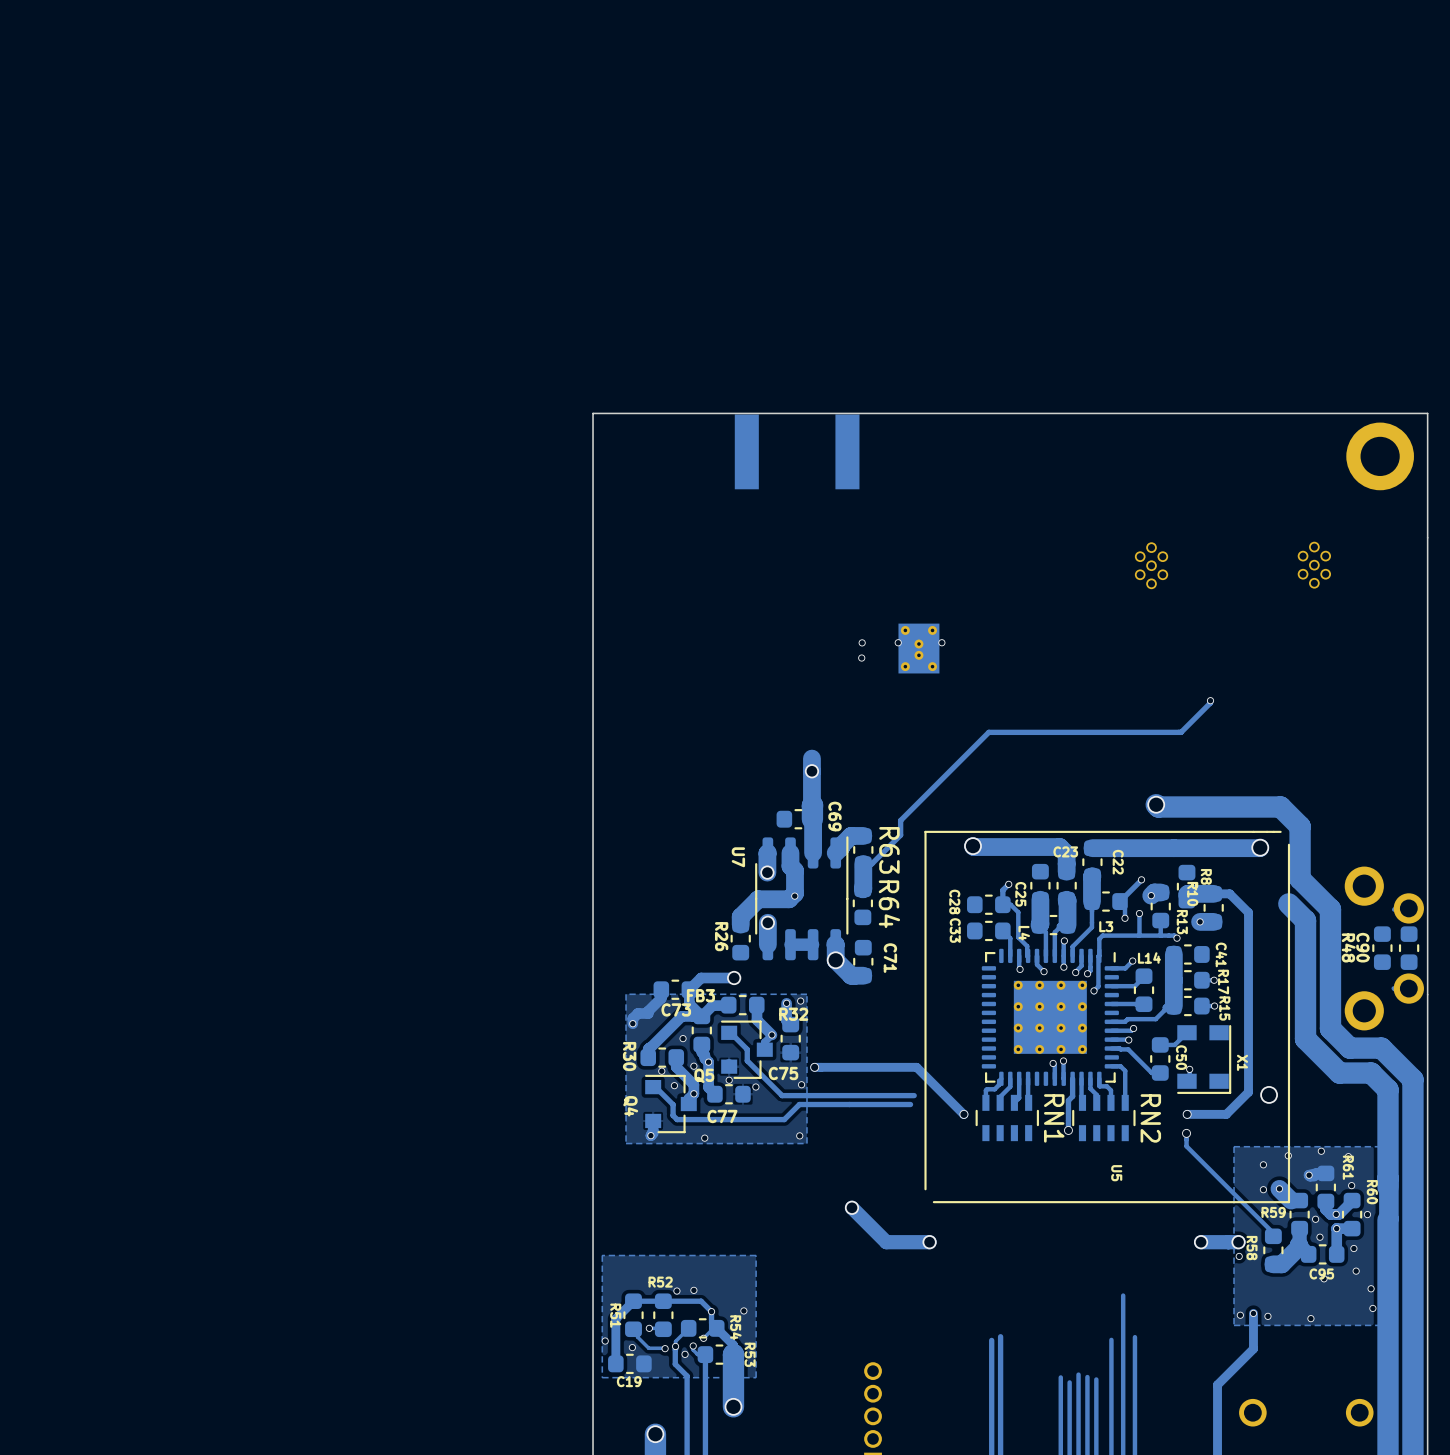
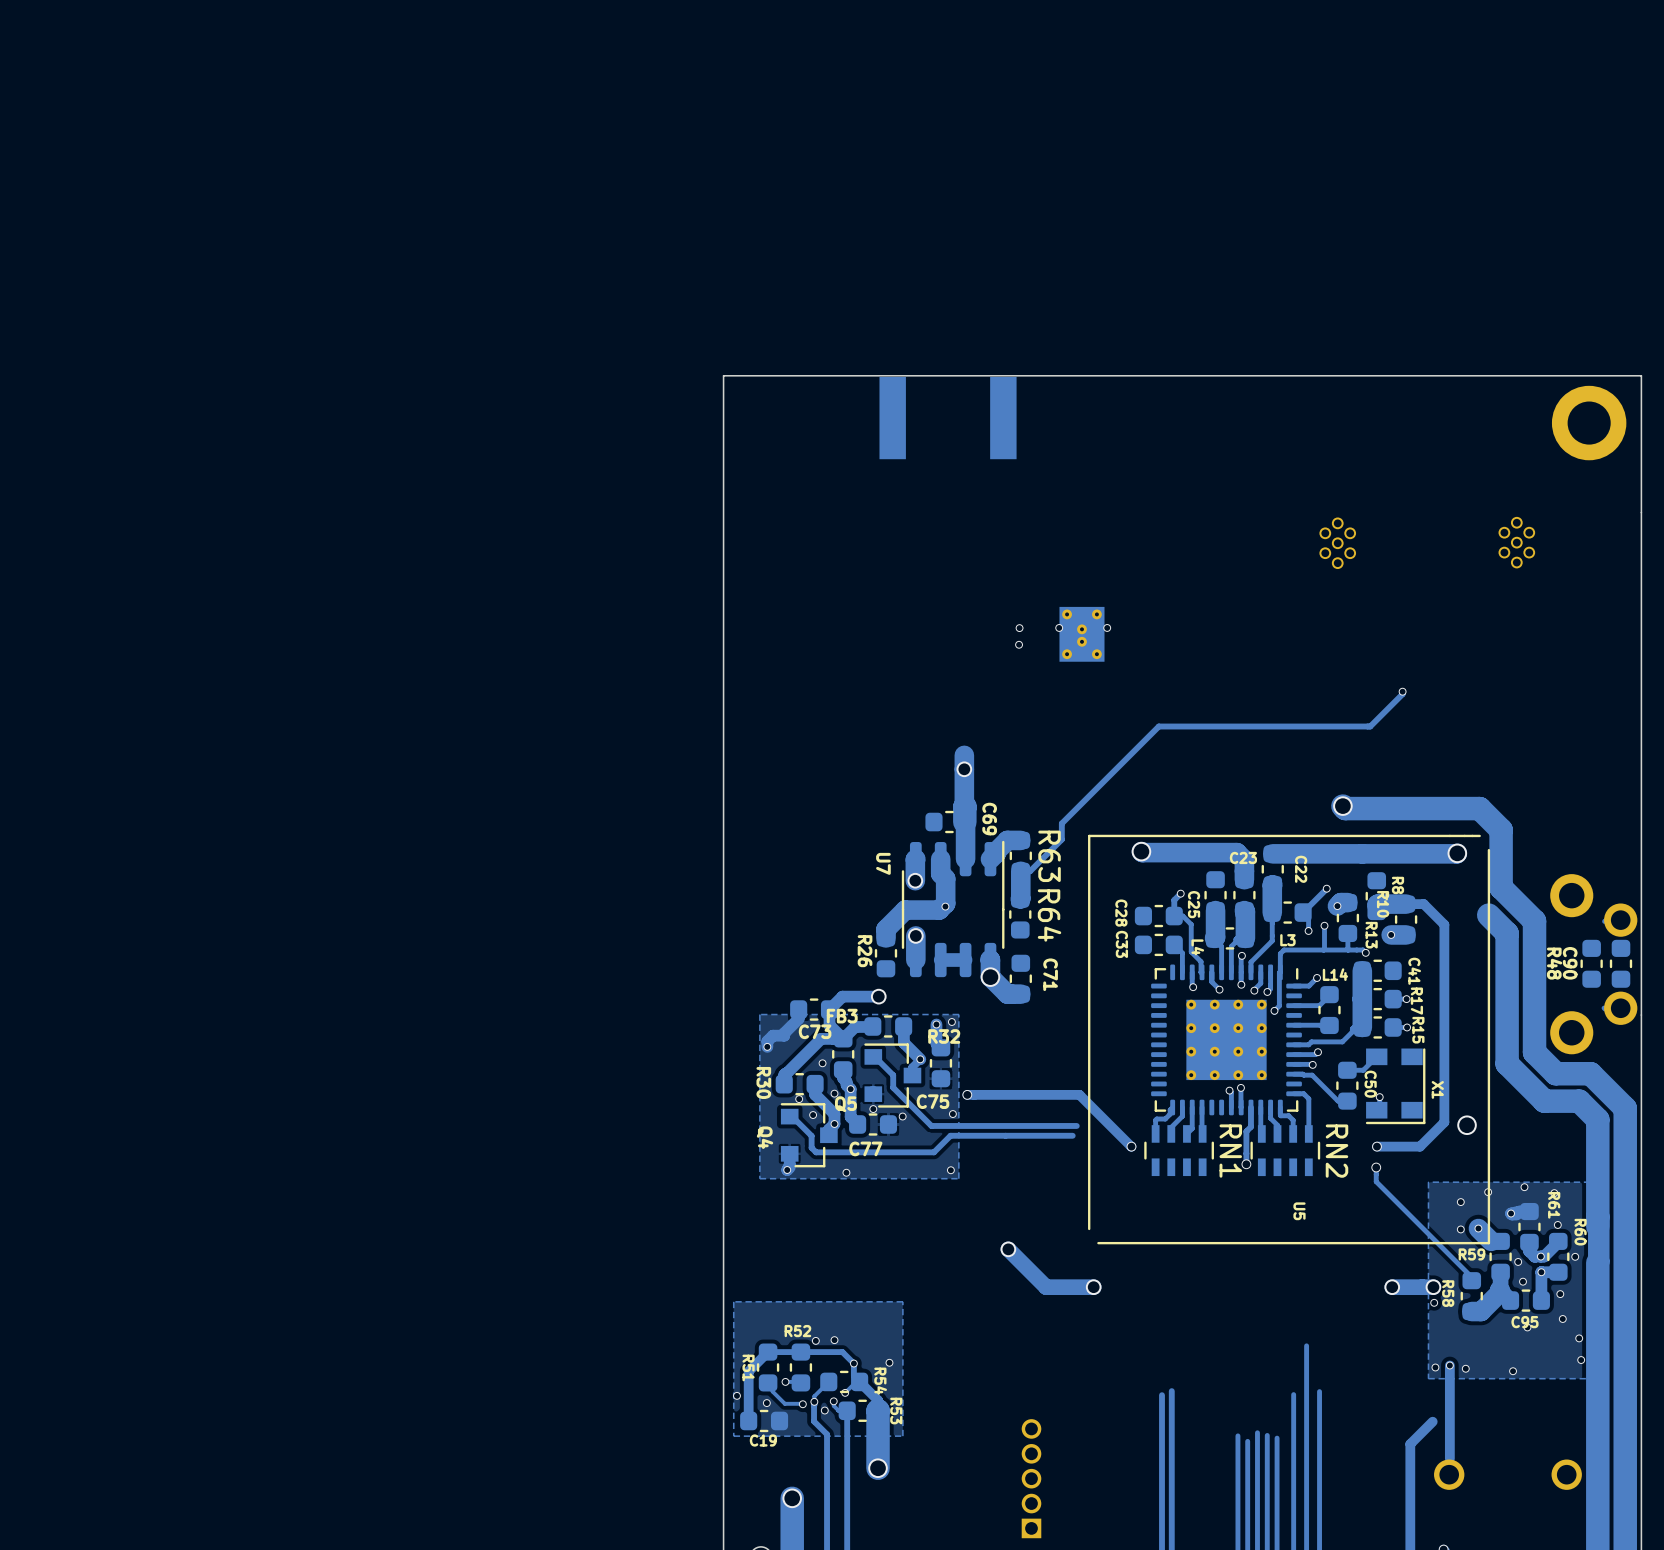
track: (1253, 1348) (1237, 1364) -> (1449, 1404) (1449, 1458)

